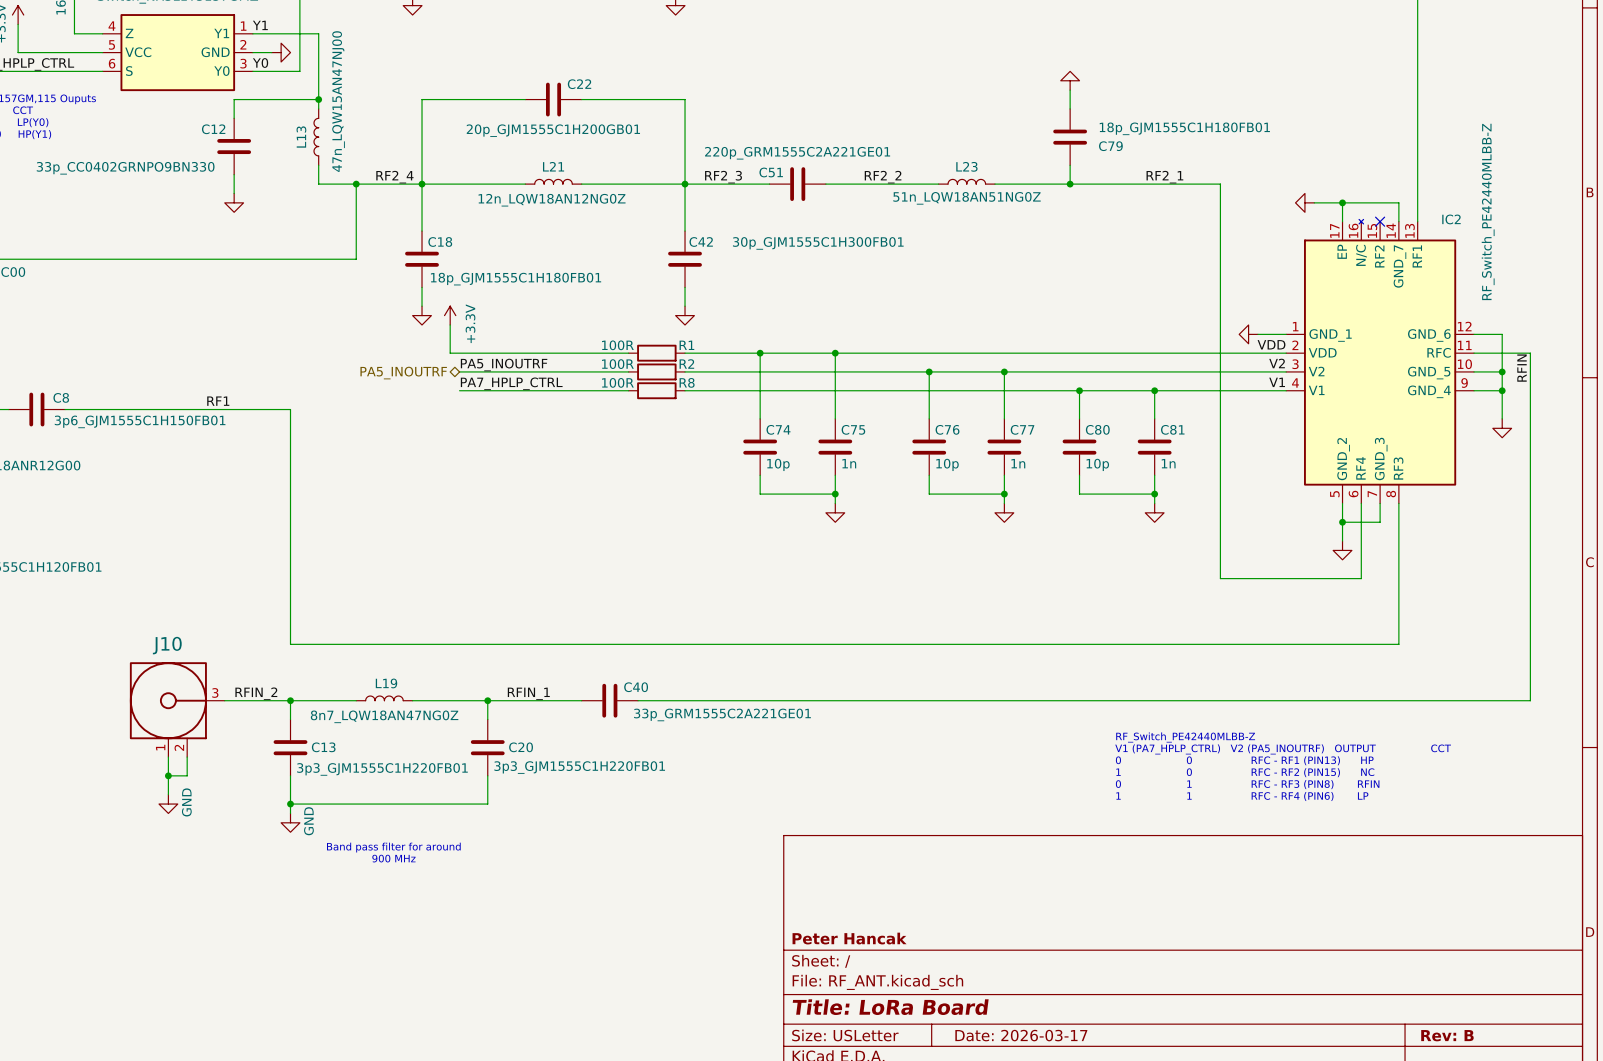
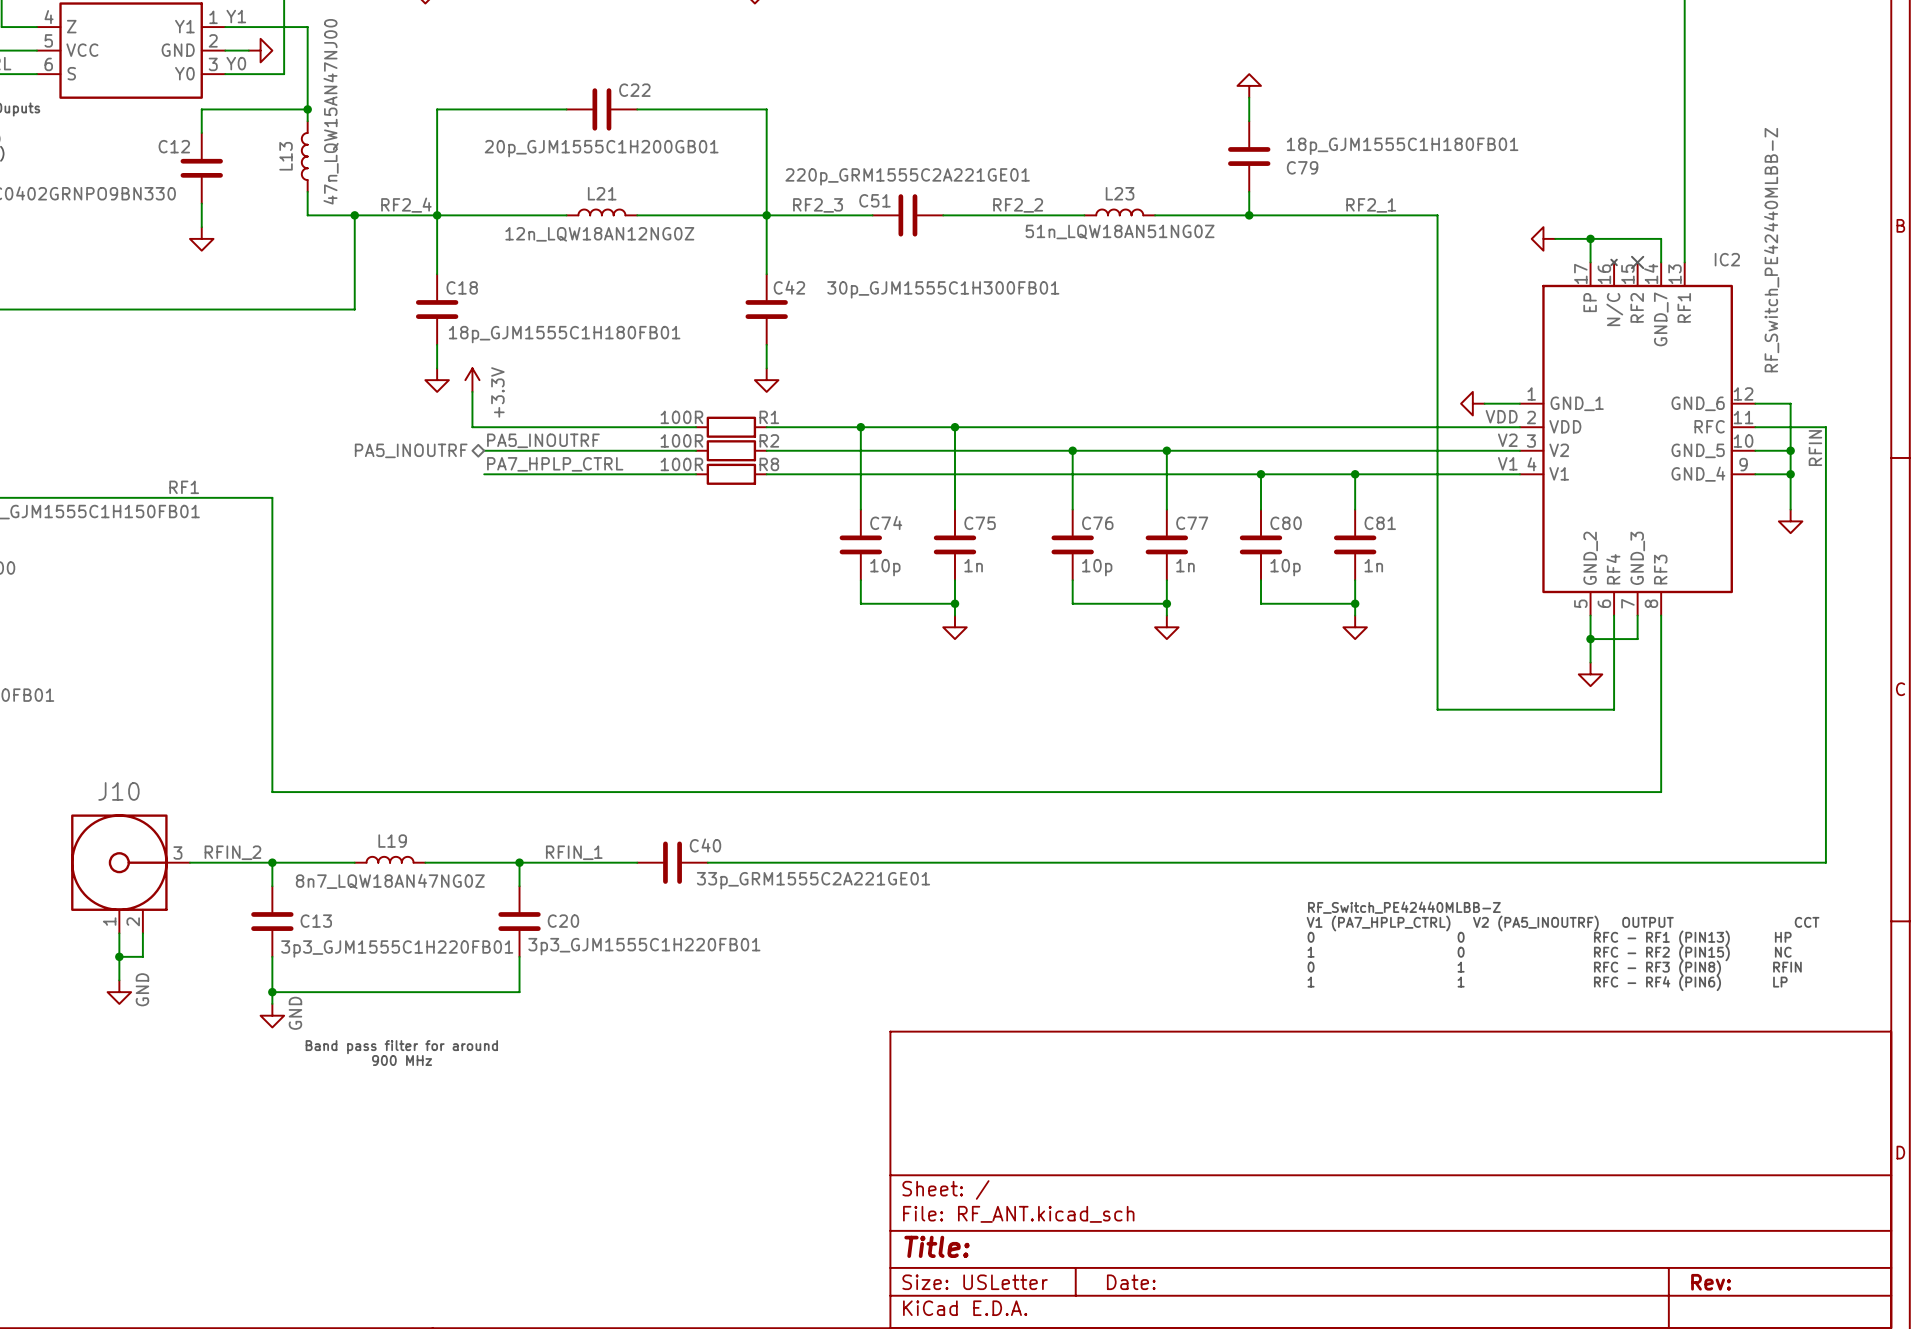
title block: Peter Hancak (849, 938) -> none
title block: Title: LoRa Board (890, 1007) -> Title: (937, 1246)
title block: Date: 2026-03-17 (1021, 1035) -> Date: (1131, 1282)
title block: Rev: B (1447, 1035) -> Rev: (1711, 1282)

